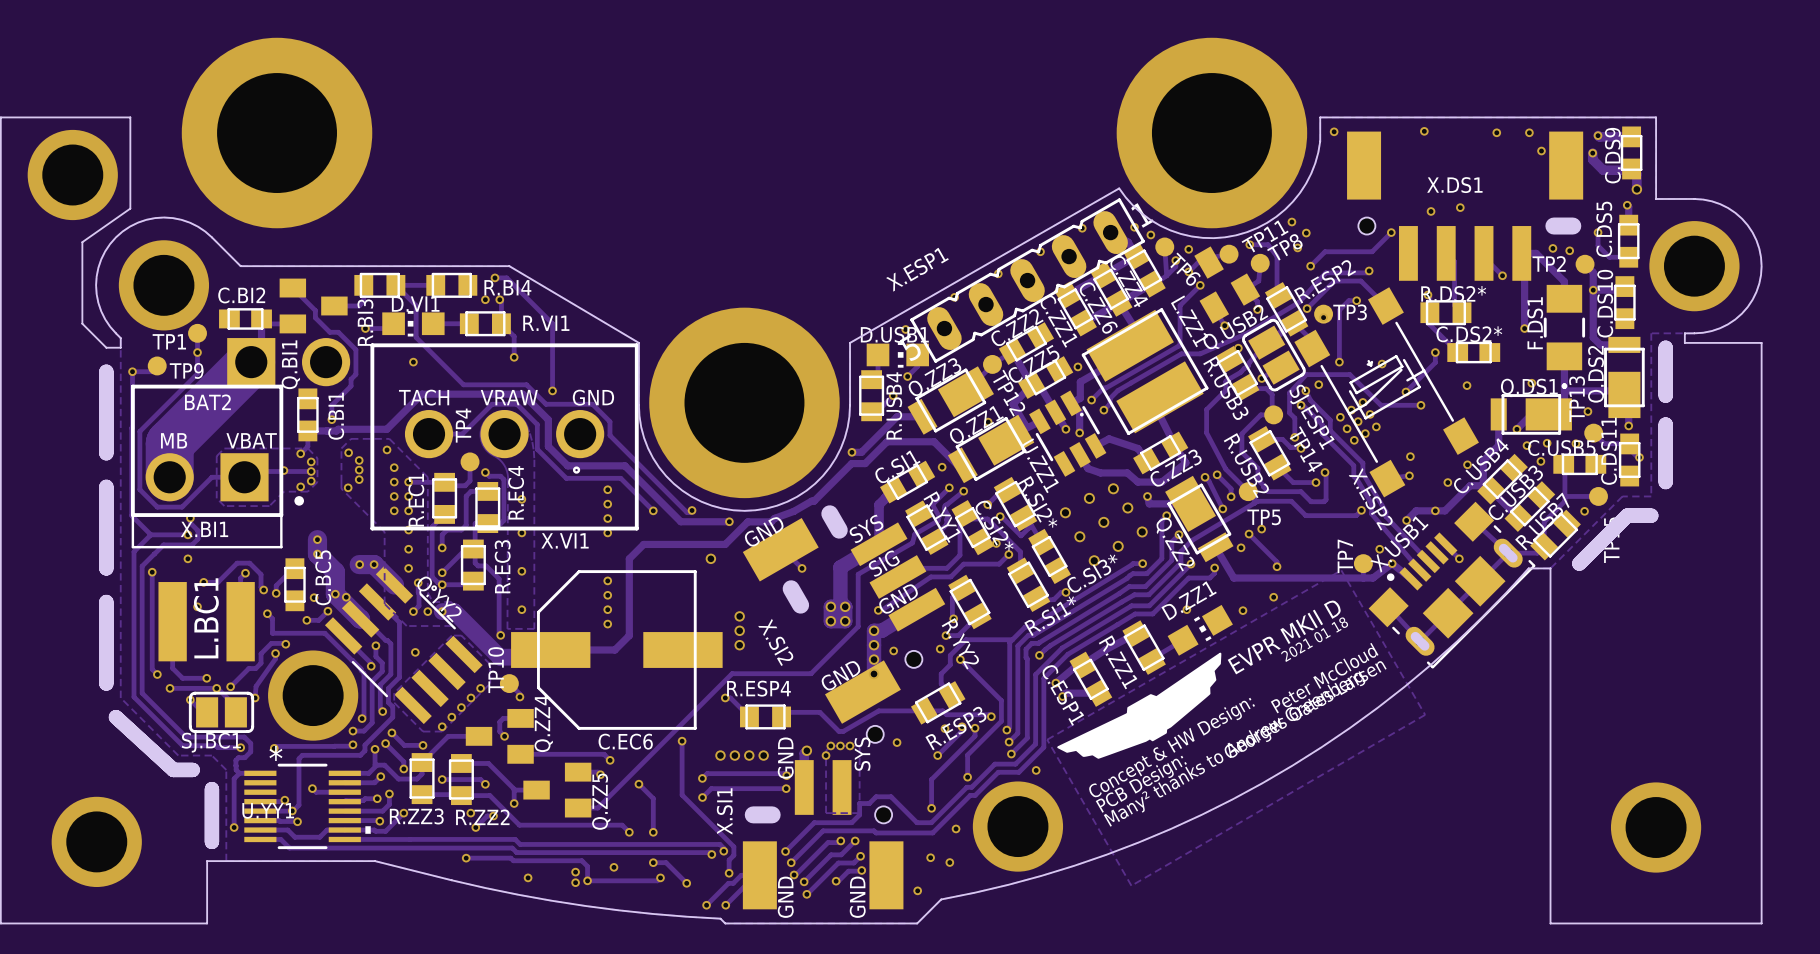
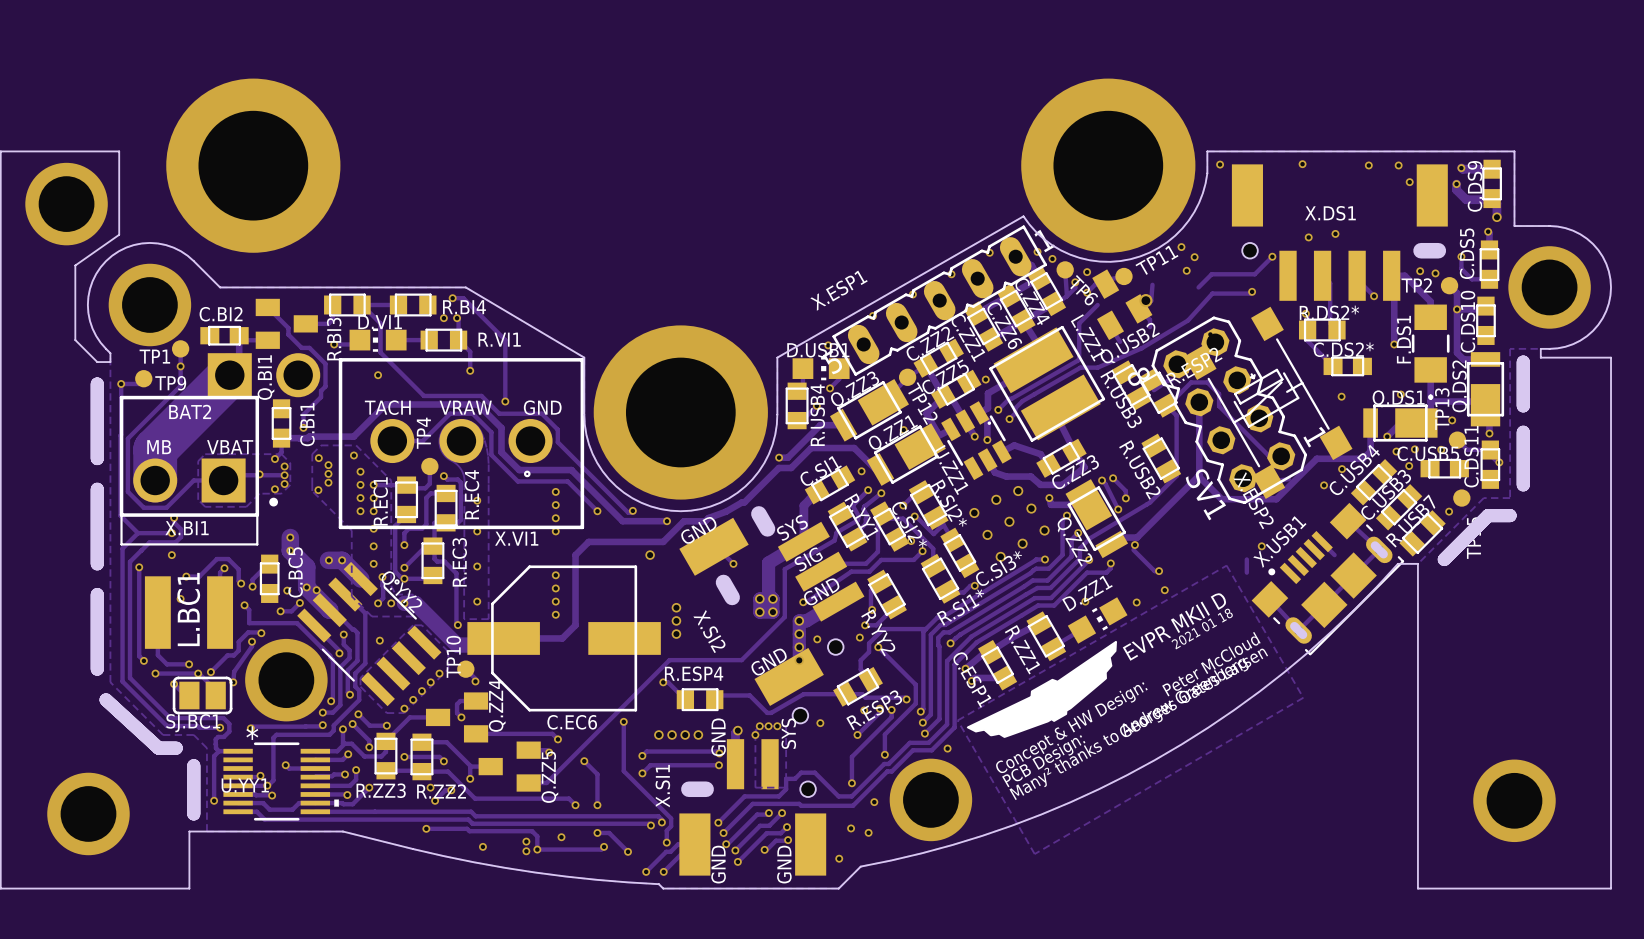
track: (1249, 244) (1268, 244) (1277, 256) (1278, 295) -> none
via: (1249, 244) -> none
TP8: (1260, 263) -> none
via: (1310, 266) -> none
via: none -> (1145, 300)
via: (1200, 285) -> none
track: (1356, 300) (1348, 300) (1339, 310) (1339, 362) -> none
via: (1356, 300) -> none
track: (1385, 306) (1360, 281) (1334, 281) (1307, 308) -> none
via: (1307, 308) -> none
via: (1257, 309) -> none
R.ESP2 position: (1286, 309) -> (1159, 392)
TP3: (1323, 314) -> none
via: (1224, 325) -> none
via: (1238, 348) -> none
track: (1312, 348) (1312, 340) (1294, 323) (1266, 342) (1248, 366) (1227, 380) (1225, 390) (1206, 409) (1206, 432) (1225, 469) (1254, 497) (1254, 503) -> none
track: (1435, 352) (1435, 362) (1405, 392) -> none
via: (1435, 352) -> none
SJ.ESP1: (1273, 355) -> none
via: (1339, 362) -> none
via: (1382, 364) -> none
via: (1261, 378) -> none
via: (1318, 384) -> none
track: (1245, 387) (1266, 388) (1272, 394) (1273, 414) (1260, 414) (1241, 433) (1241, 452) (1257, 468) (1257, 479) (1263, 486) (1268, 491) (1301, 491) (1311, 501) (1324, 501) (1326, 499) (1325, 472) -> none
track: (1305, 390) (1310, 400) (1330, 420) (1330, 430) (1362, 463) (1362, 473) (1385, 511) (1385, 516) (1428, 561) -> none
via: (1305, 390) -> none
via: (1405, 392) -> none
SV1: none -> (1229, 410)
via: (1362, 402) -> none
track: (1301, 405) (1322, 424) (1322, 433) (1353, 465) (1353, 476) (1371, 503) (1371, 513) (1419, 570) -> none
via: (1301, 405) -> none
track: (1420, 405) (1380, 405) (1349, 374) (1306, 374) (1289, 392) (1289, 412) (1294, 418) (1294, 437) -> none
via: (1420, 405) -> none
via: (1351, 410) -> none
TP14: (1273, 414) -> none
via: (1370, 414) -> none
via: (1340, 417) -> none
via: (1358, 421) -> none
via: (1376, 426) -> none
via: (1347, 428) -> none
via: (1365, 433) -> none
via: (1294, 437) -> none
track: (1261, 439) (1282, 439) (1290, 447) (1301, 448) -> none
via: (1354, 440) -> none
via: (1301, 448) -> none
track: (1490, 453) (1483, 460) (1483, 482) (1518, 517) -> (1363, 458) (1316, 458) (1276, 499) (1221, 499) (1198, 476)
via: (1410, 456) -> none
track: (1563, 464) (1564, 501) (1544, 521) (1544, 546) (1537, 553) (1508, 553) -> none
track: (1277, 467) (1293, 482) (1315, 482) -> none
via: (1325, 472) -> none
via: (1409, 475) -> none
via: (1315, 482) -> none
track: (1486, 485) (1470, 485) (1444, 510) (1416, 510) (1406, 520) -> none
TP5: (1248, 491) -> none
track: (1564, 496) (1598, 496) -> none
track: (1257, 501) (1291, 501) (1305, 515) (1356, 515) (1361, 510) -> (1150, 502) (1176, 475) (1176, 415) (1166, 405) (1191, 382) (1207, 382) (1219, 394) (1219, 406) (1268, 455) (1281, 456)
via: (1361, 510) -> none
via: (1435, 510) -> none
via: (1406, 520) -> none
via: (1261, 529) -> none
track: (1249, 534) (1277, 562) (1277, 566) -> none
via: (1249, 534) -> none
track: (1215, 547) (1233, 578) (1372, 578) (1392, 563) (1411, 578) -> (1111, 544) (1118, 537) (1137, 537) (1199, 475) (1199, 402)
track: none -> (1133, 549) (1154, 571) (1159, 571)
via: (1459, 558) -> none
TP7: (1363, 563) -> none
via: (1392, 563) -> none
via position: (1277, 566) -> (1159, 571)

